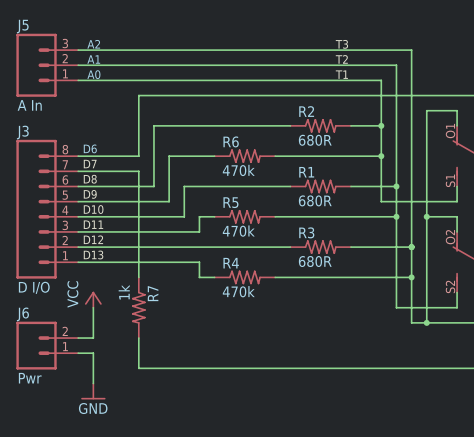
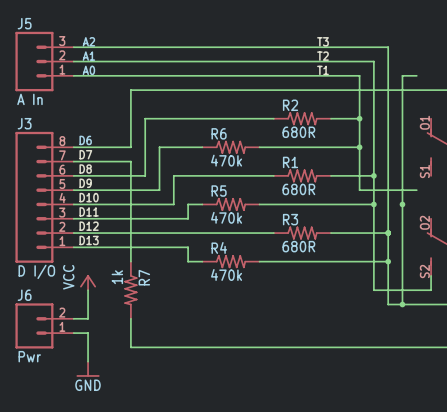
wire: (426, 110) (457, 110) (457, 125) -> (402, 104) (402, 75) (416, 75)
wire: (457, 186) (457, 201) (441, 201) -> none
wire: (426, 216) (457, 216) (457, 231) -> none

